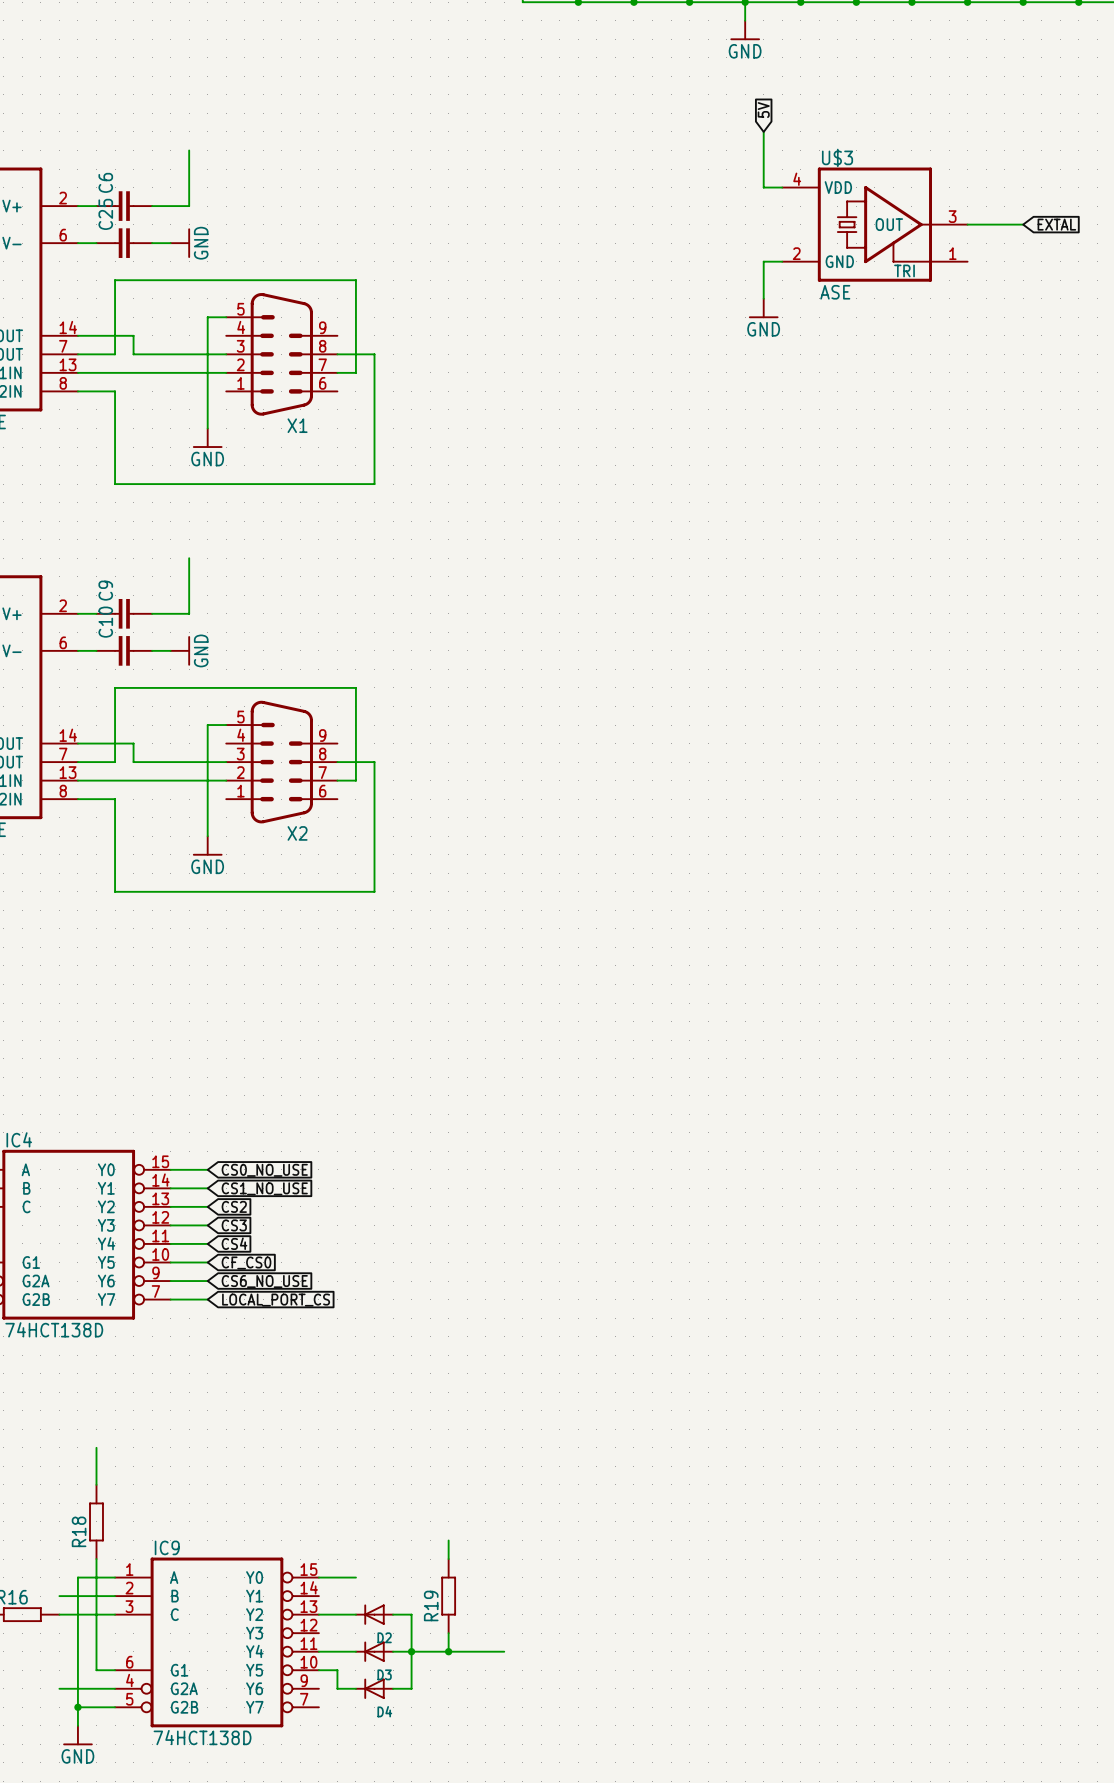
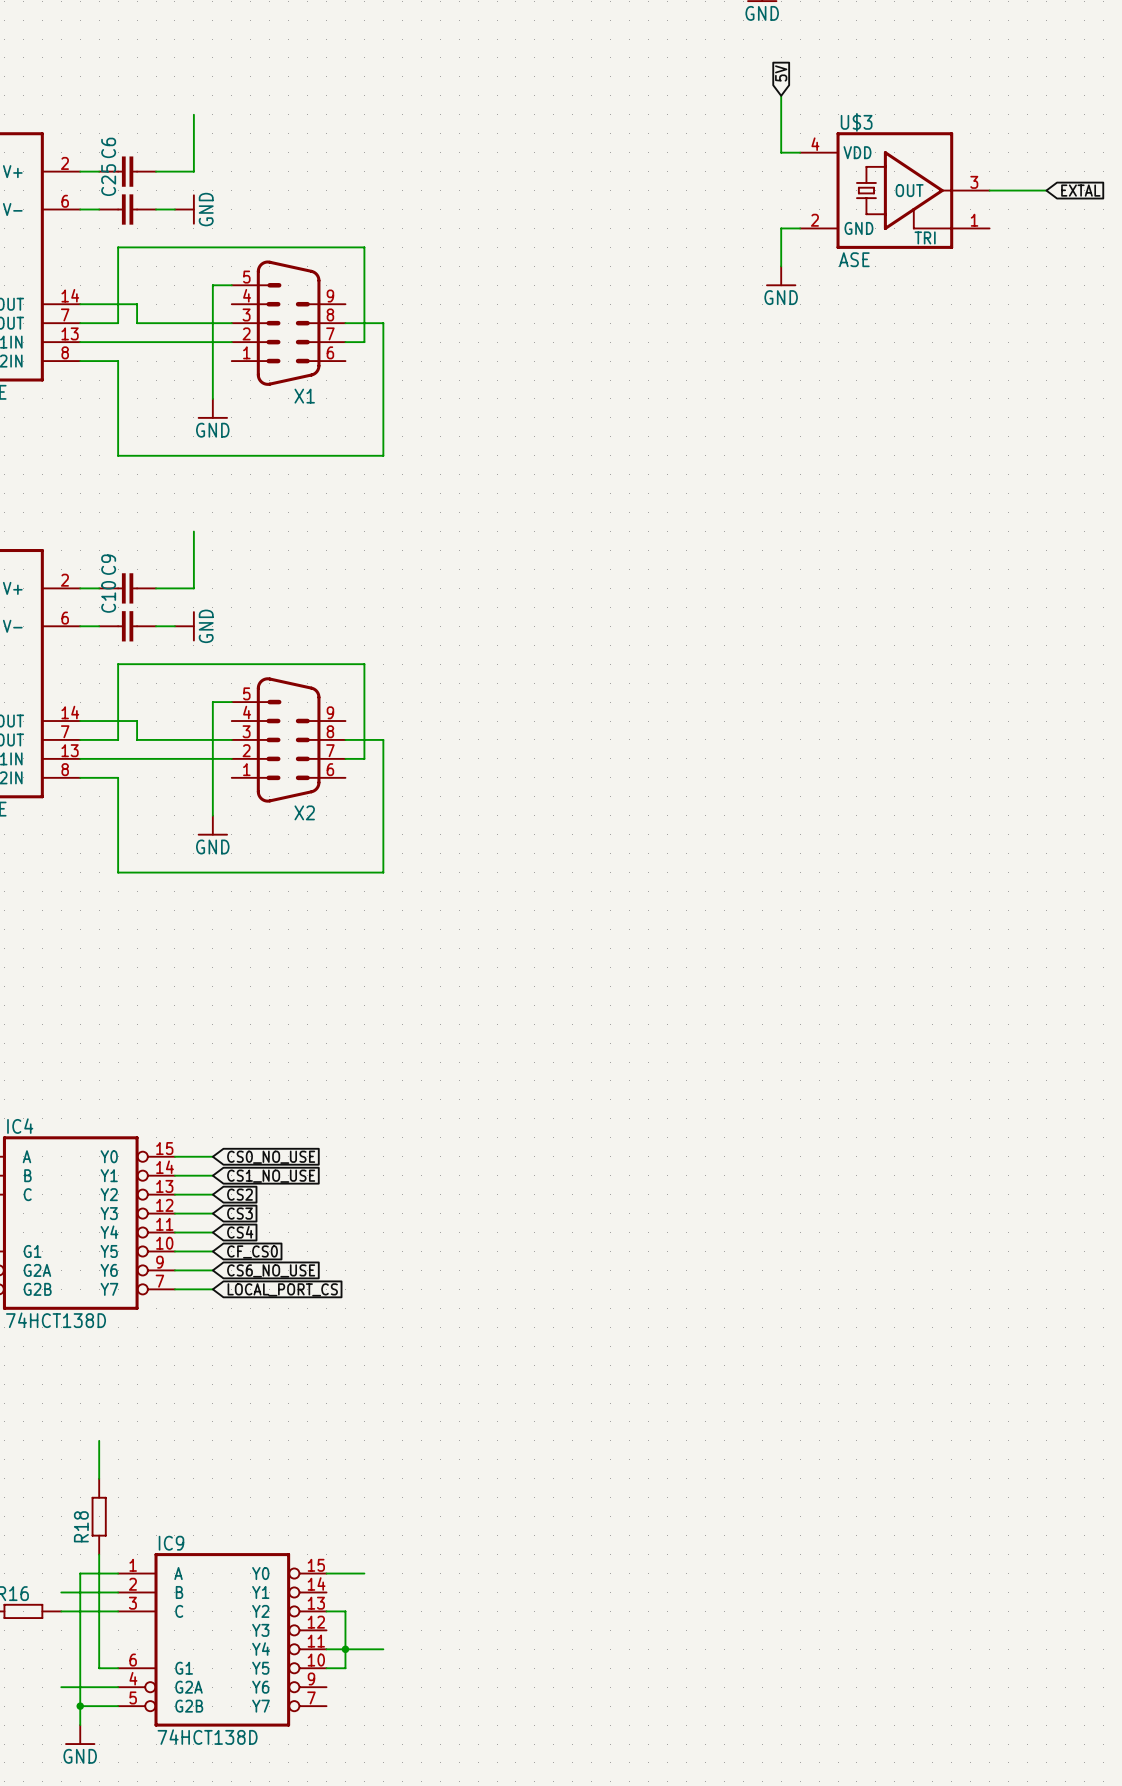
wire: (448, 1540) (448, 1559) -> none
R19: (448, 1596) -> none
wire: (337, 1614) (355, 1614) -> (345, 1611) (345, 1668)
D2: (374, 1614) -> none
wire: (393, 1614) (411, 1614) (411, 1688) (393, 1688) -> none
wire: (448, 1633) (448, 1651) -> none
junction: none -> (345, 1649)
D3: (374, 1651) -> none
wire: (393, 1651) (504, 1651) -> none
junction: (411, 1651) -> none
junction: (448, 1651) -> none
wire: (337, 1670) (337, 1688) (355, 1688) -> none
D4: (374, 1688) -> none

